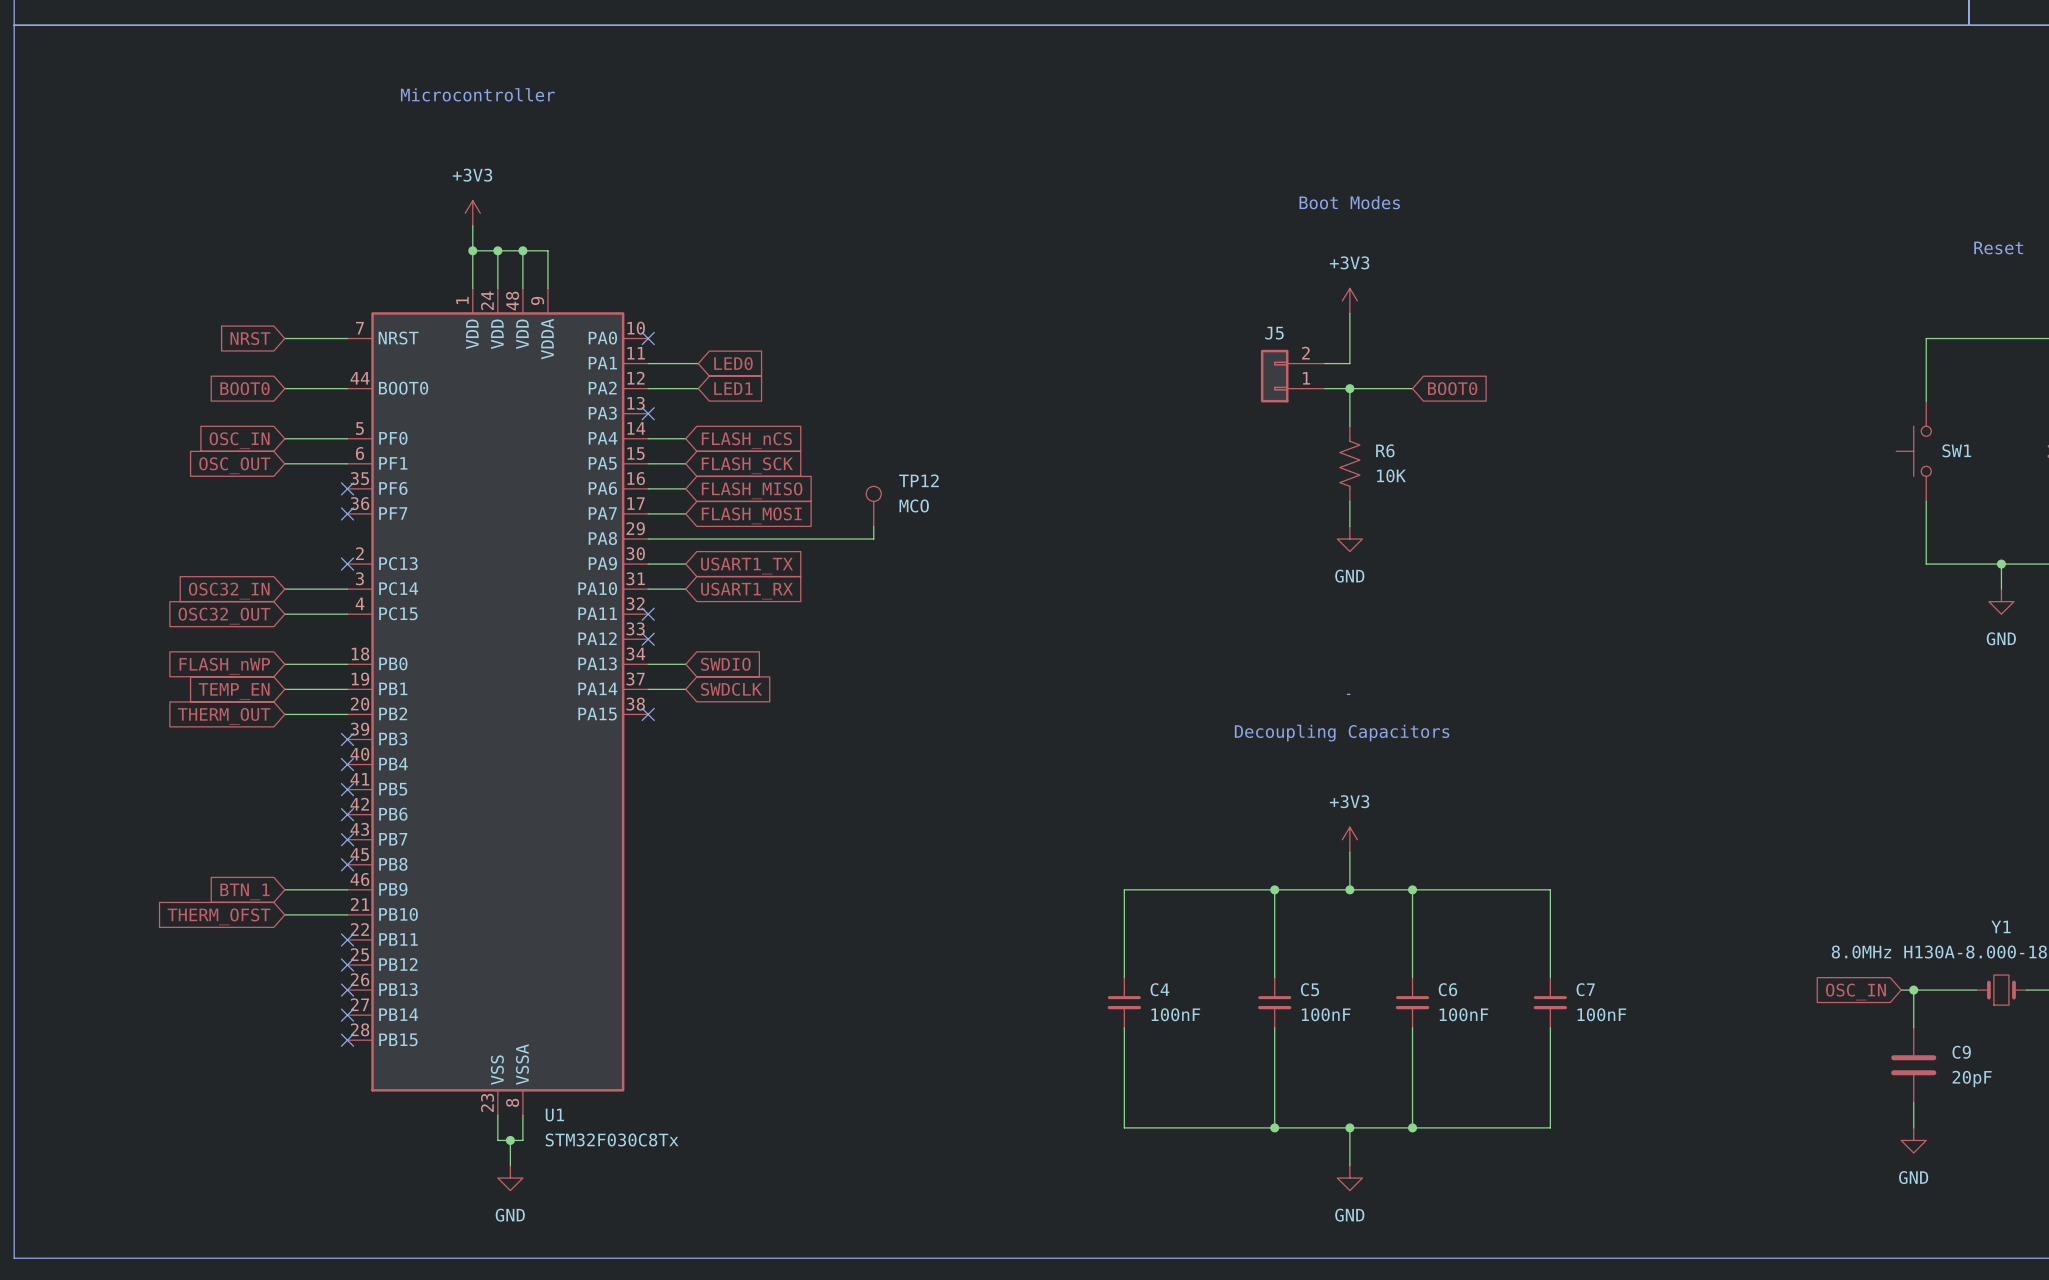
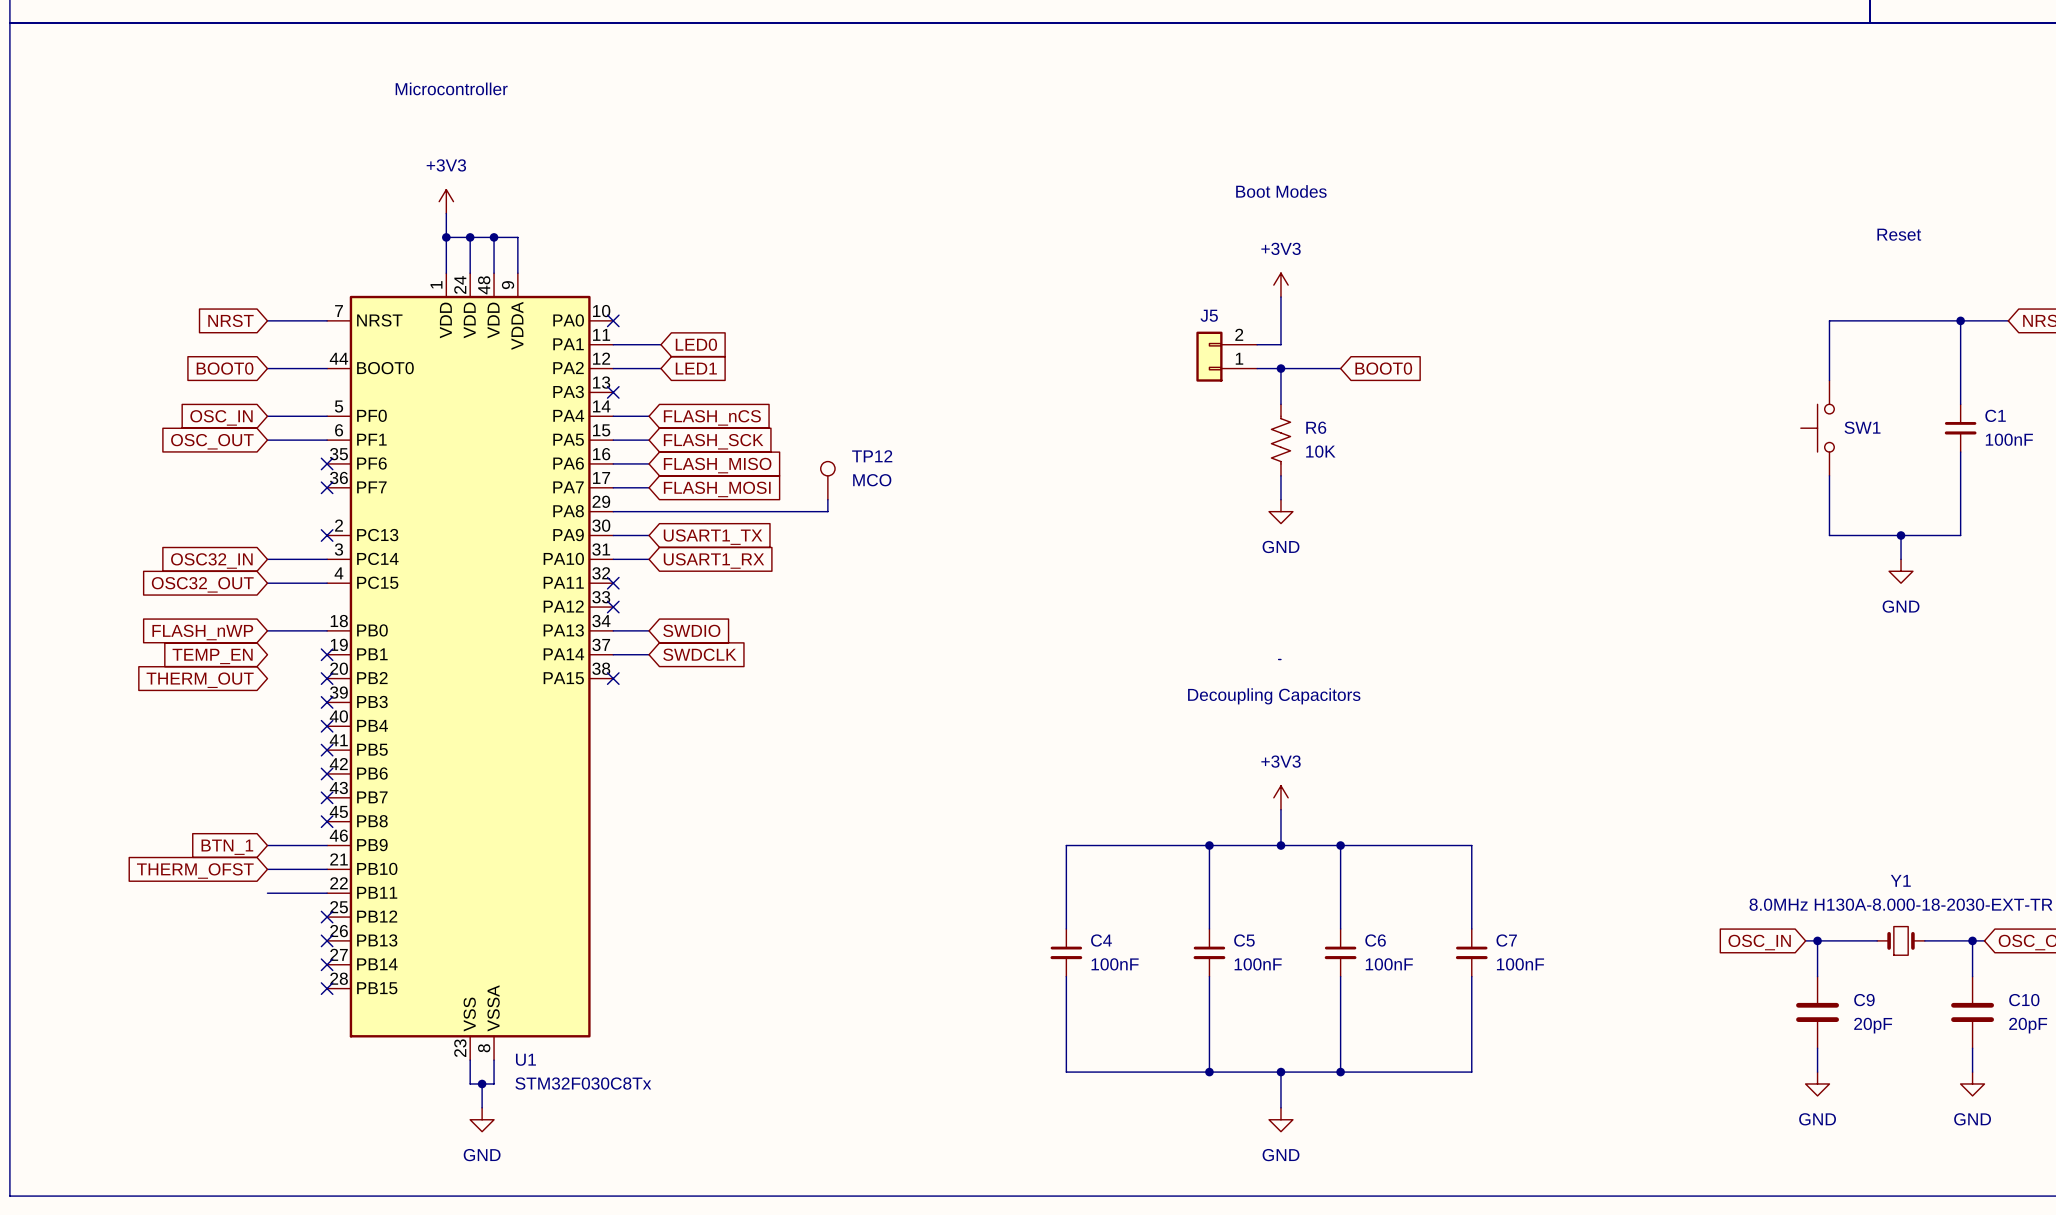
wire: (284, 689) (347, 689) -> none
no-connect mark: none -> (327, 654)
wire: (284, 714) (347, 714) -> (267, 893) (327, 893)
no-connect mark: none -> (327, 678)
no-connect mark: (347, 939) -> none

